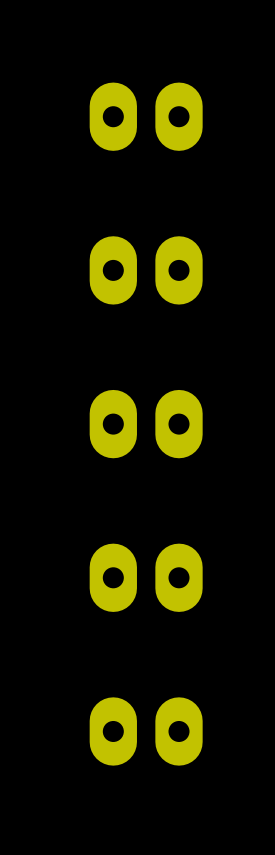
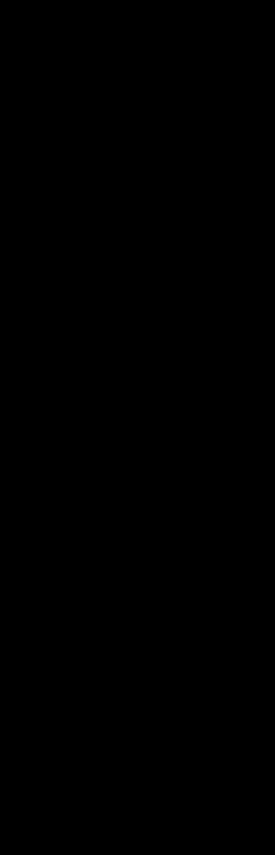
part: (146, 116) -> none
part: (146, 270) -> none
part: (146, 424) -> none
part: (146, 577) -> none
part: (146, 731) -> none

